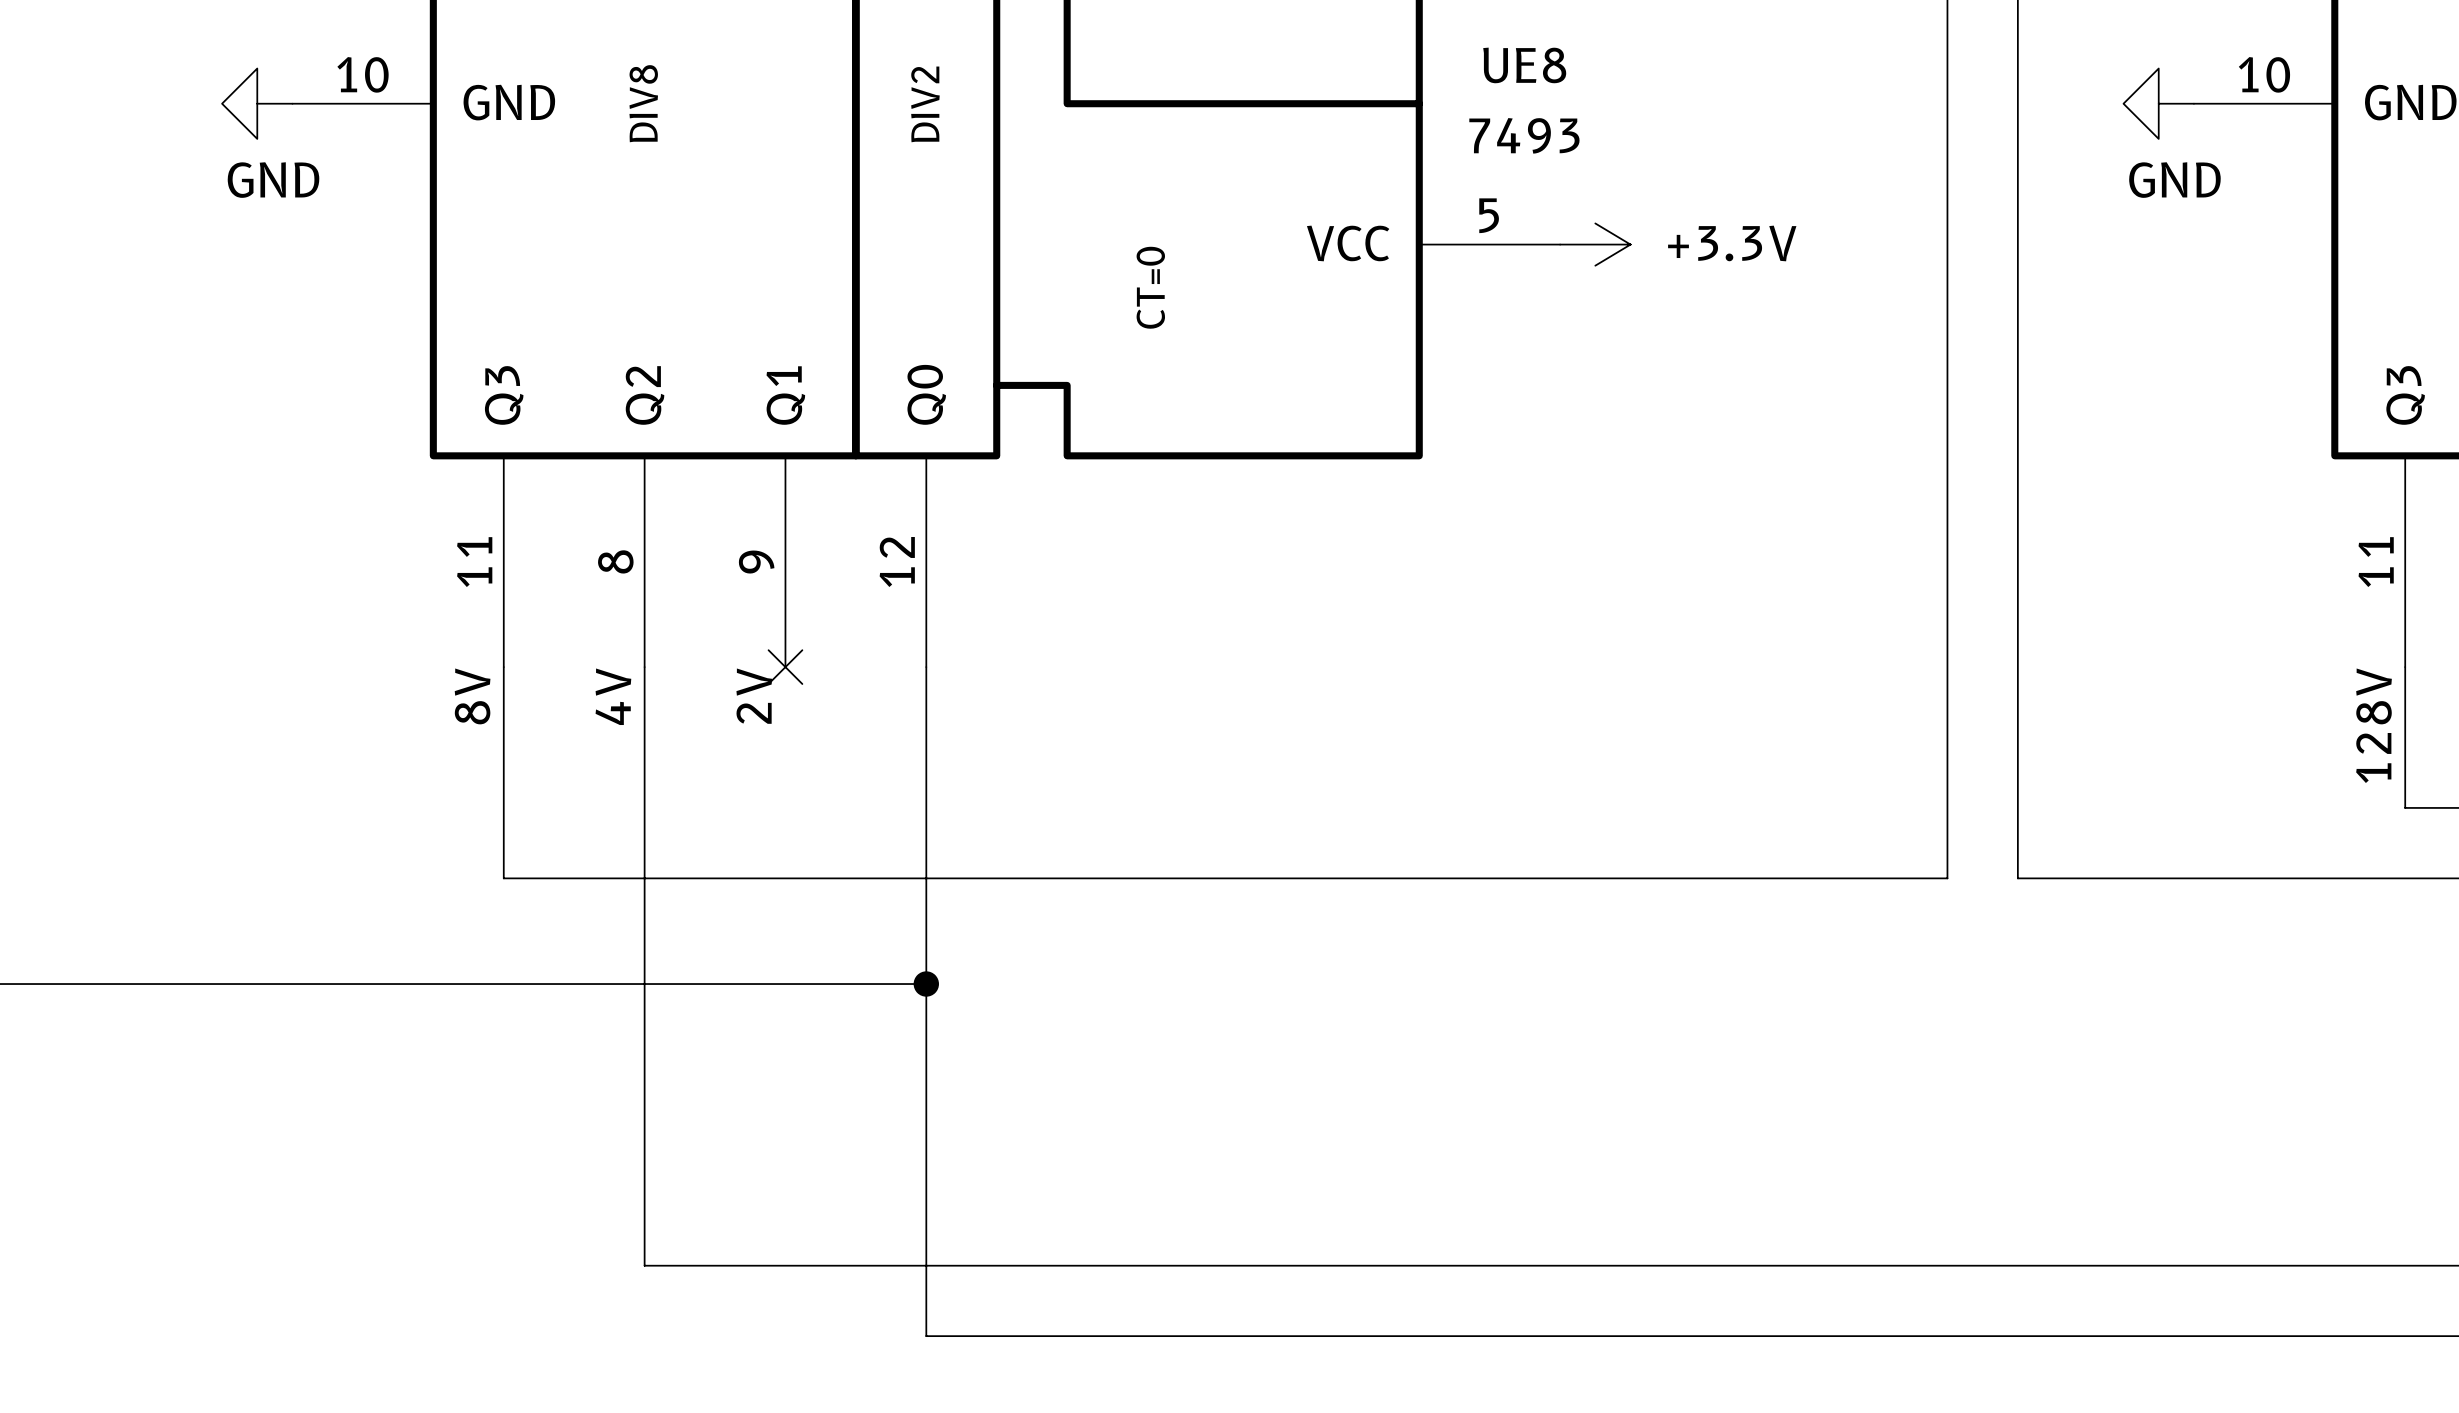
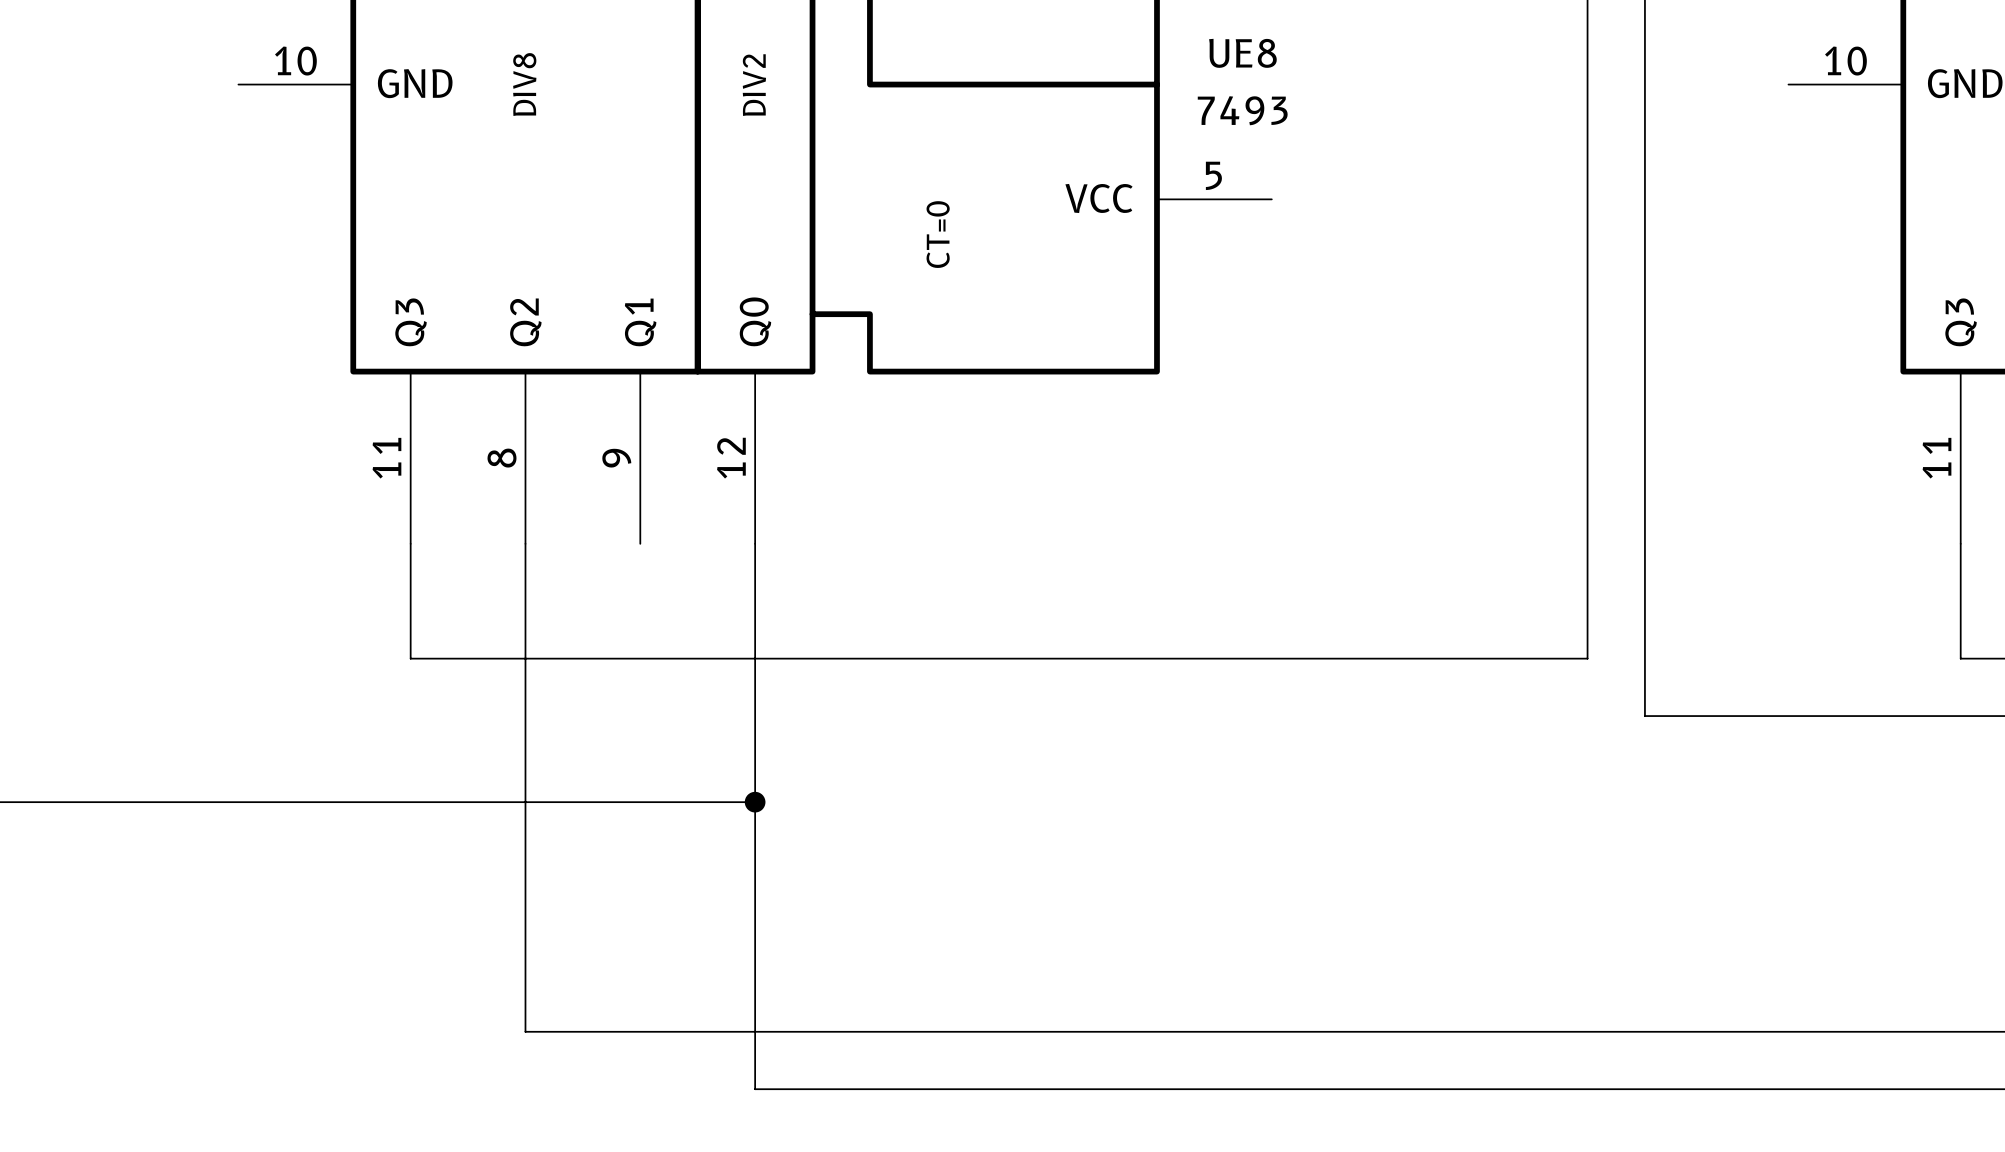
power symbol: GND (257, 103) -> none
power symbol: GND (2158, 103) -> none
power symbol: +3.3V (1595, 244) -> none
no-connect mark: (785, 667) -> none
label: 8V (472, 696) -> none
label: 4V (613, 696) -> none
label: 2V (754, 696) -> none
label: 128V (2374, 725) -> none
wire: (503, 807) (503, 878) (1947, 878) (1947, 807) -> (410, 658) (1587, 658)

